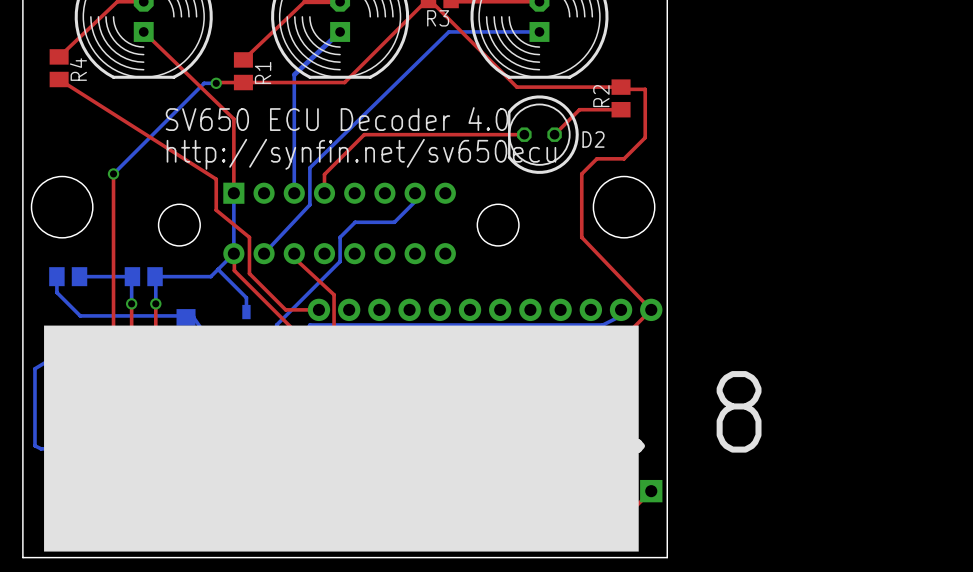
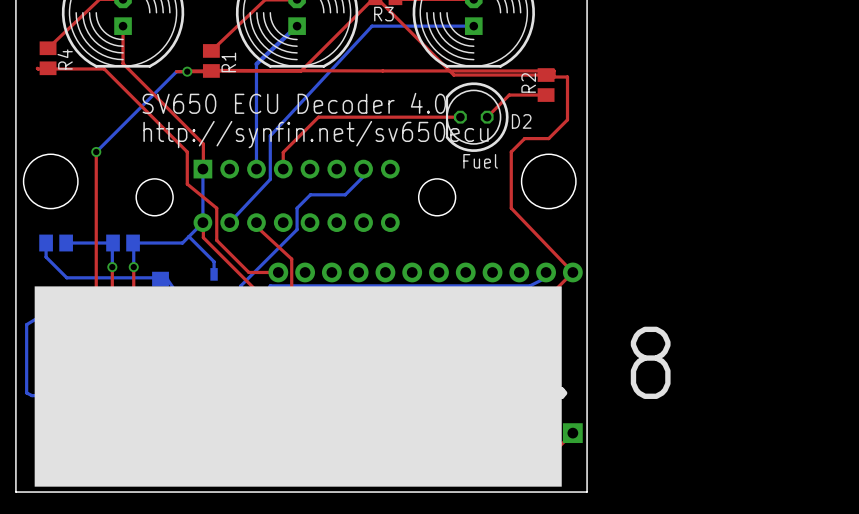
top track: (143, 31) (233, 119) (233, 193) -> (123, 26) (123, 63) (203, 143) (202, 169)
bottom track: (448, 31) (309, 167) -> (393, 26) (372, 26) (270, 135) (270, 146)
top track: (59, 79) (216, 179) -> (37, 68) (104, 68) (187, 151) (187, 156)
top track: none -> (176, 71) (554, 70) (554, 77)
text: none -> Fuel (480, 161)

